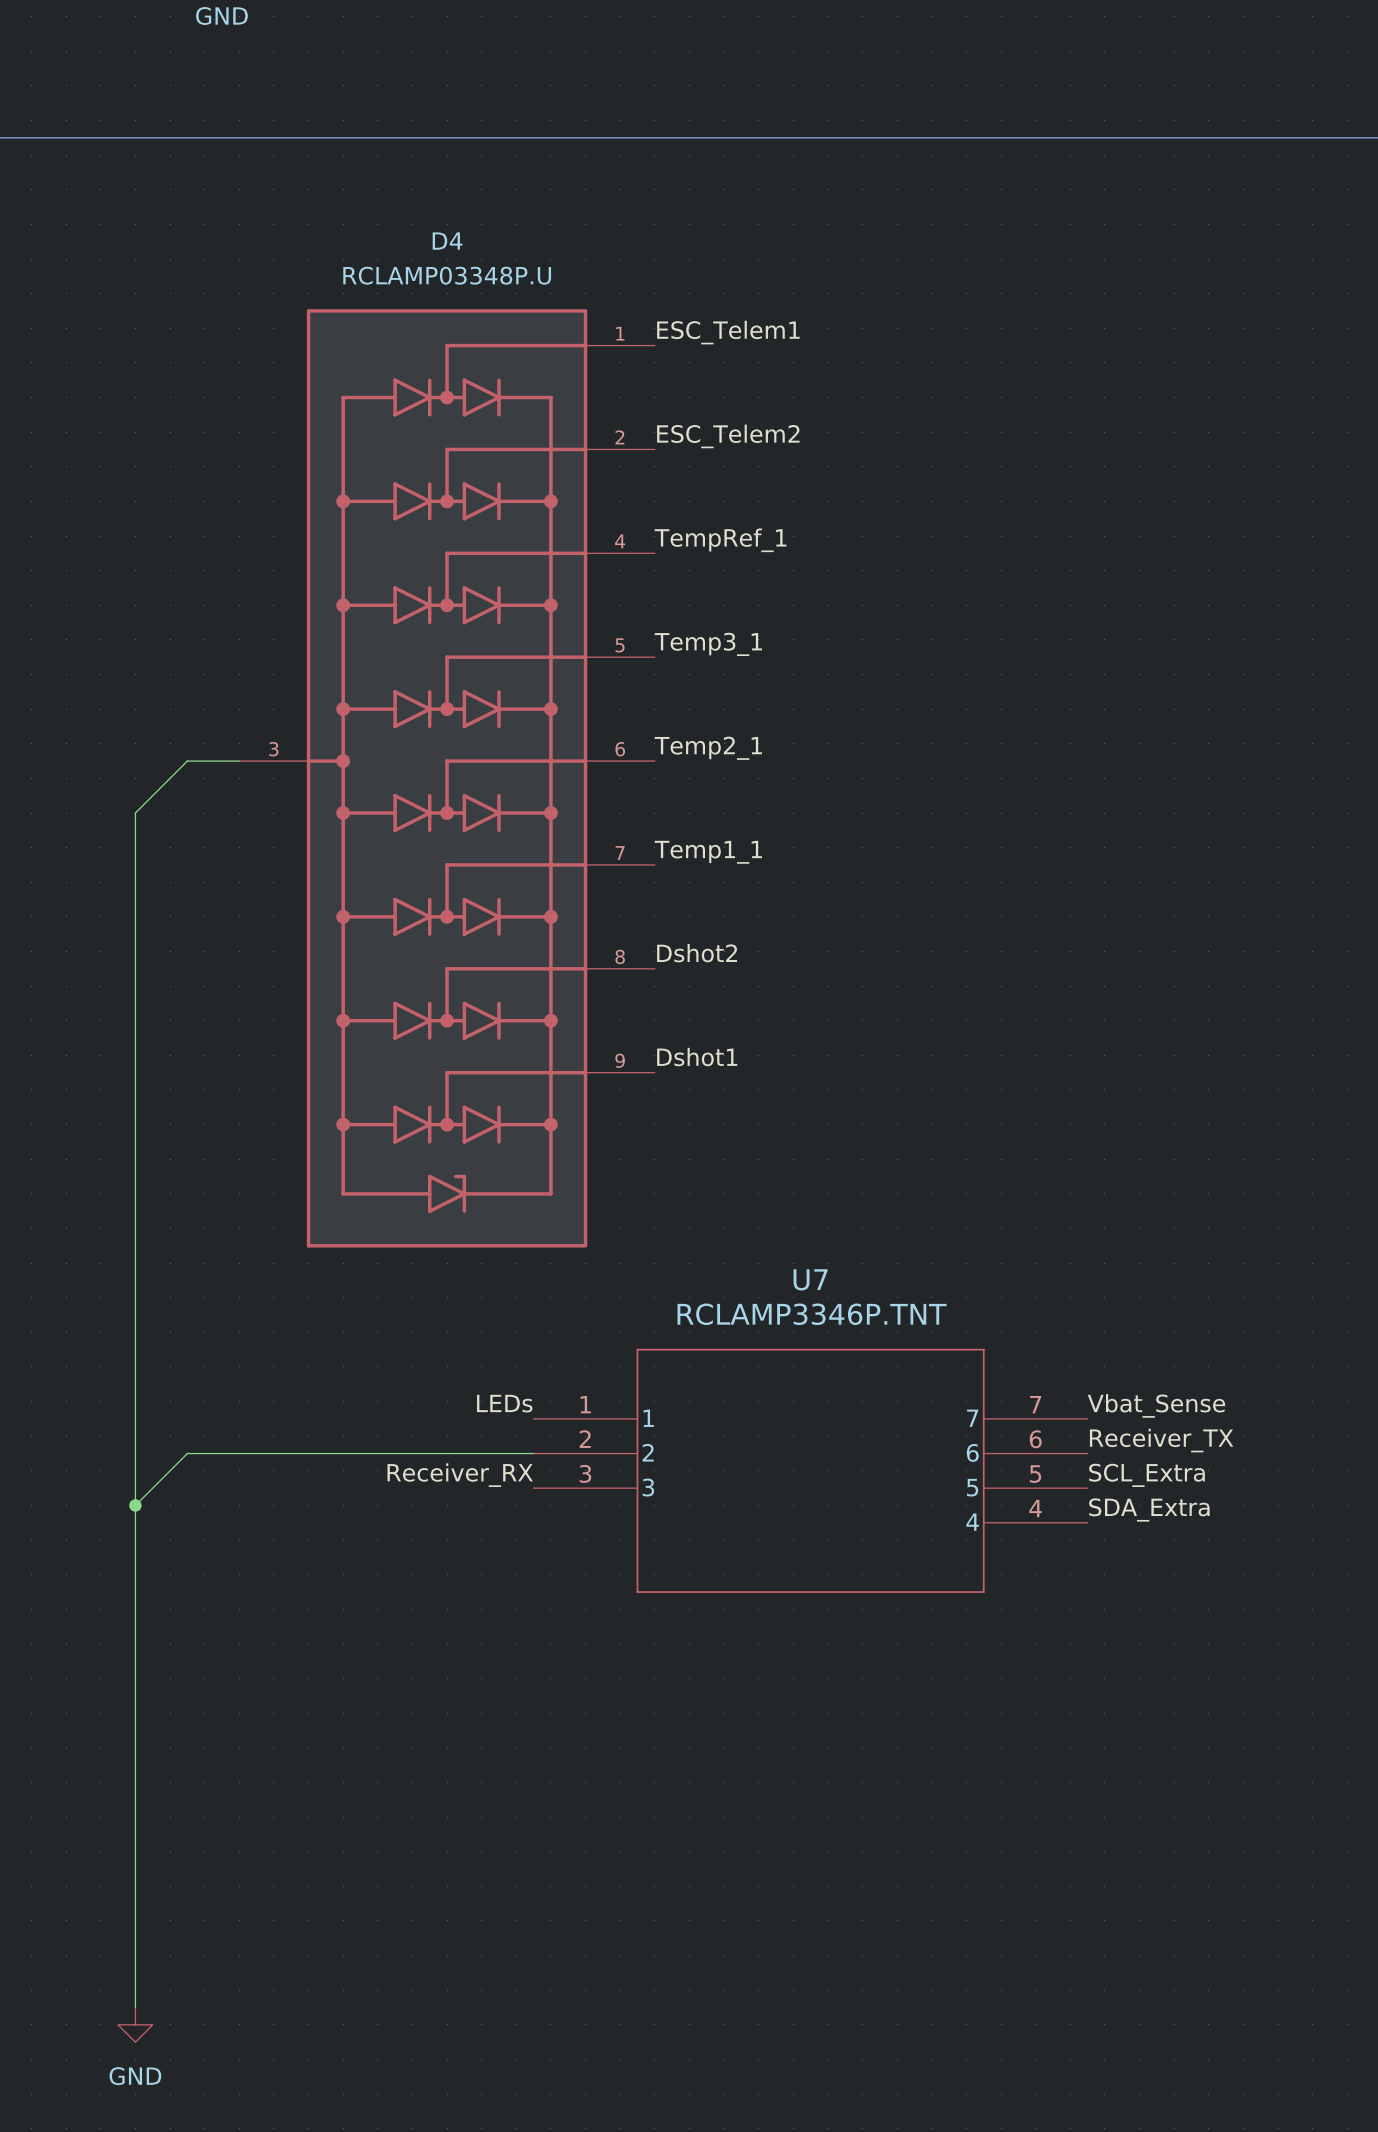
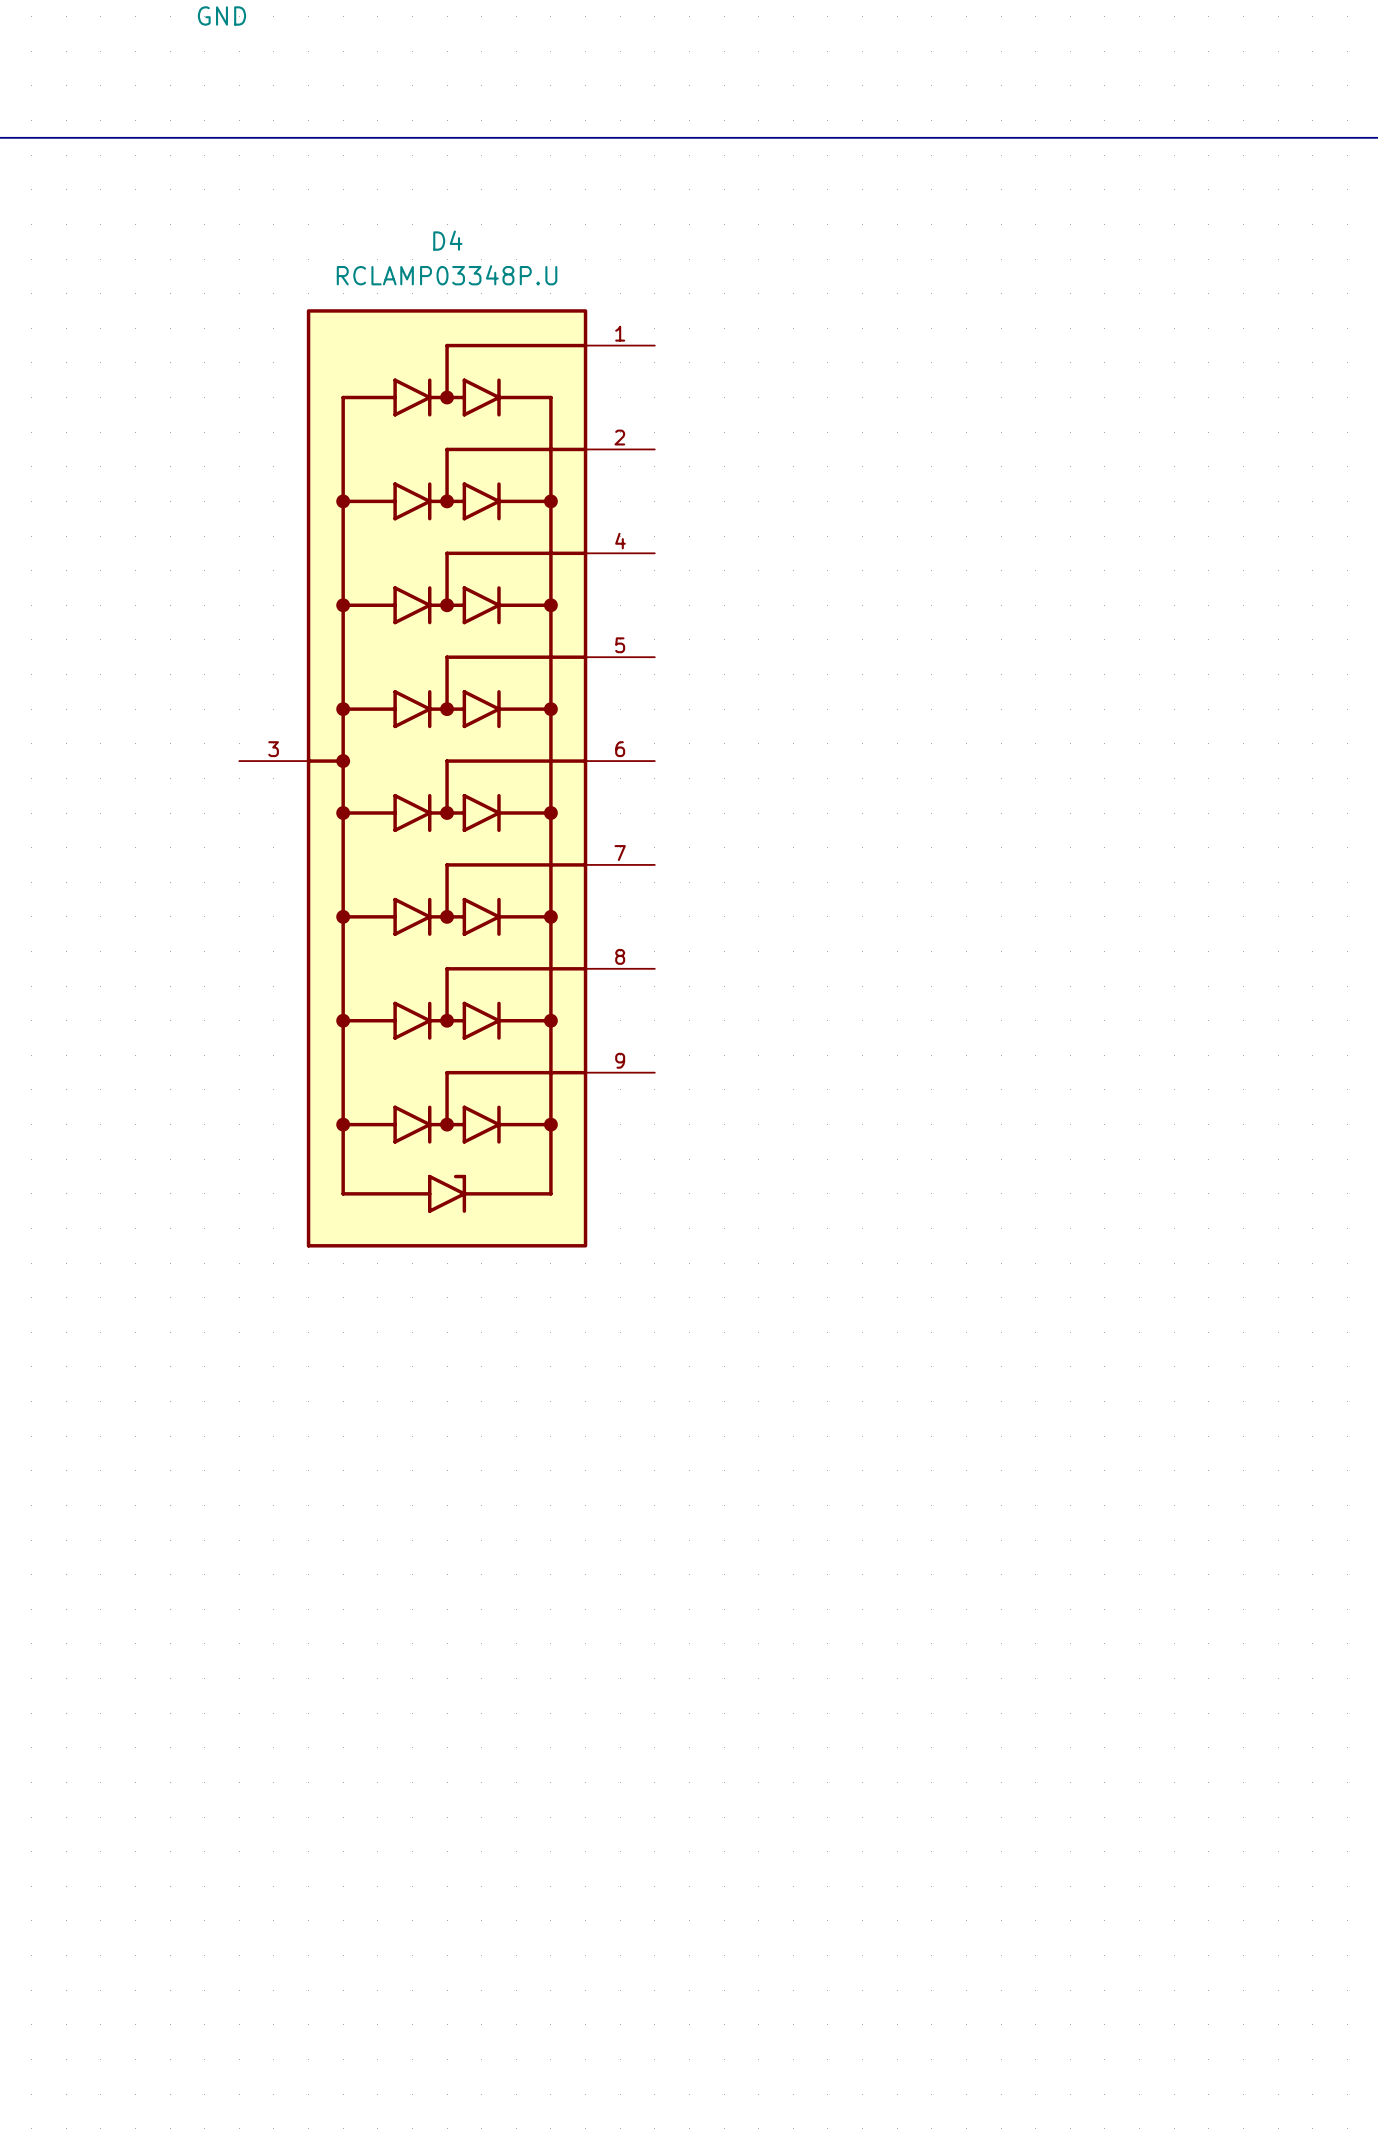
label: ESC_Telem1 (728, 332) -> none
label: ESC_Telem2 (728, 436) -> none
label: TempRef_1 (720, 540) -> none
label: Temp3_1 (708, 644) -> none
label: Temp2_1 (708, 748) -> none
wire: (239, 761) (187, 761) (135, 813) (135, 2007) -> none
label: Temp1_1 (708, 852) -> none
label: Dshot2 (697, 953) -> none
label: Dshot1 (697, 1057) -> none
label: LEDs (504, 1403) -> none
label: Vbat_Sense (1156, 1405) -> none
label: Receiver_TX (1161, 1440) -> none
wire: (533, 1453) (187, 1453) (135, 1505) -> none
U7: RCLAMP3346P.TNT (810, 1470) -> none
label: Receiver_RX (460, 1475) -> none
label: SCL_Extra (1147, 1475) -> none
junction: (135, 1505) -> none
label: SDA_Extra (1149, 1509) -> none
power symbol: GND (135, 2024) -> none

